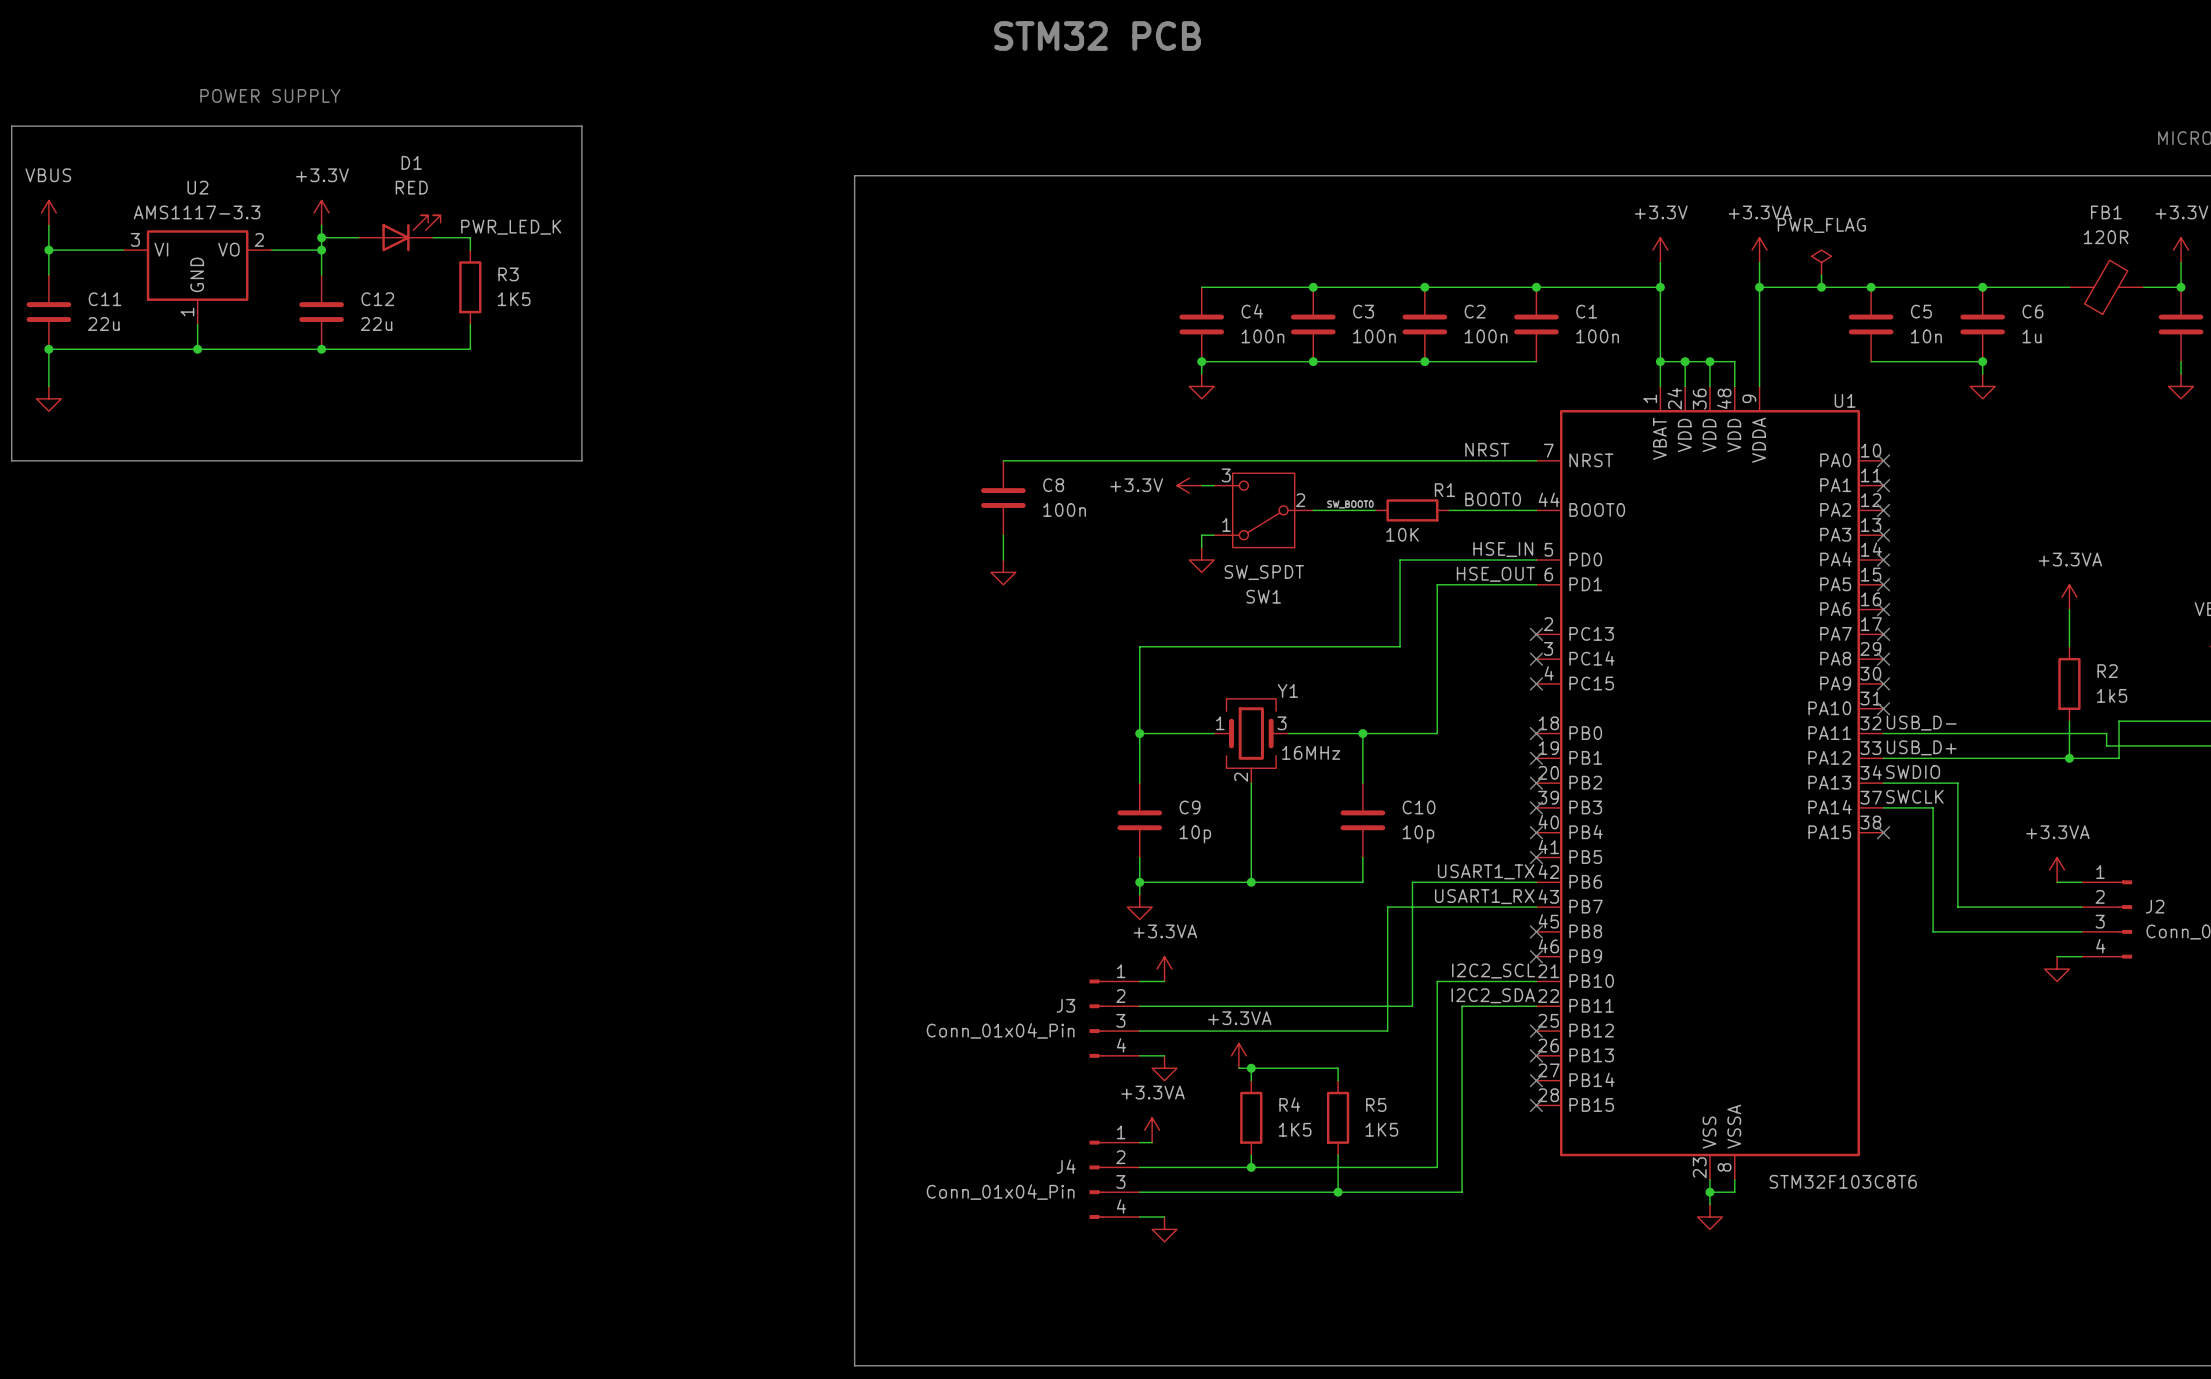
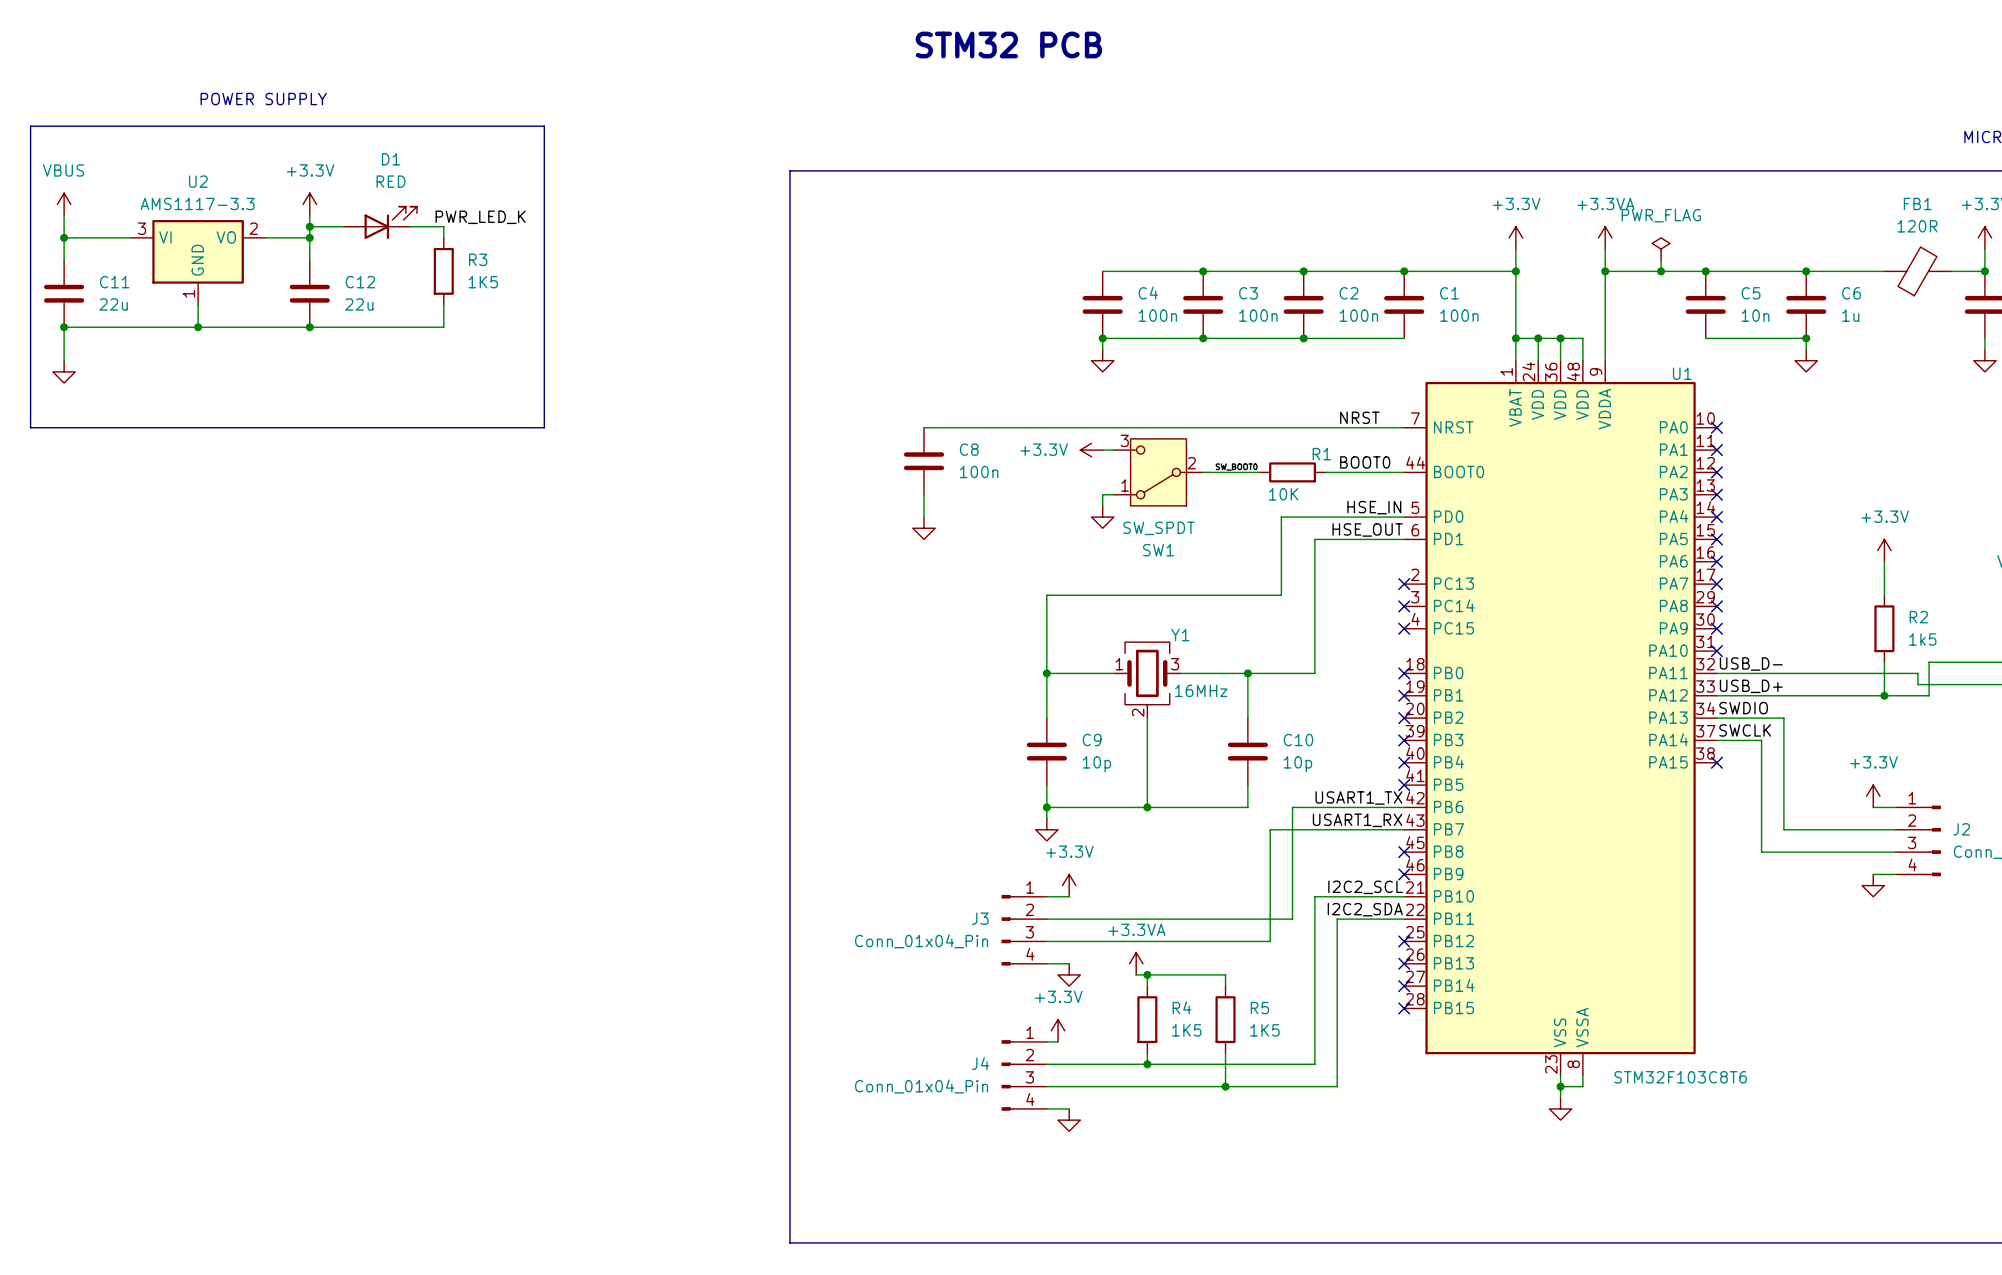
power symbol: +3.3VA (2069, 597) -> +3.3V (1884, 550)
power symbol: +3.3VA (2057, 869) -> +3.3V (1873, 796)
power symbol: +3.3VA (1164, 969) -> +3.3V (1069, 885)
power symbol: +3.3VA (1152, 1130) -> +3.3V (1058, 1030)

